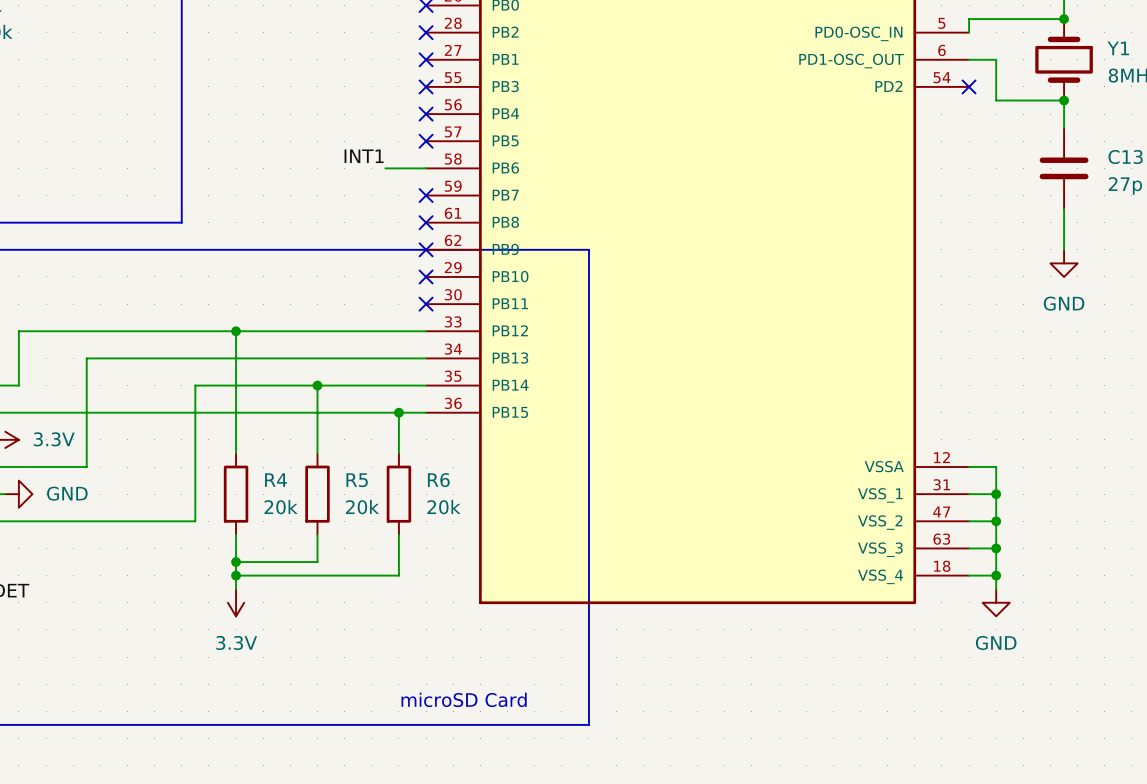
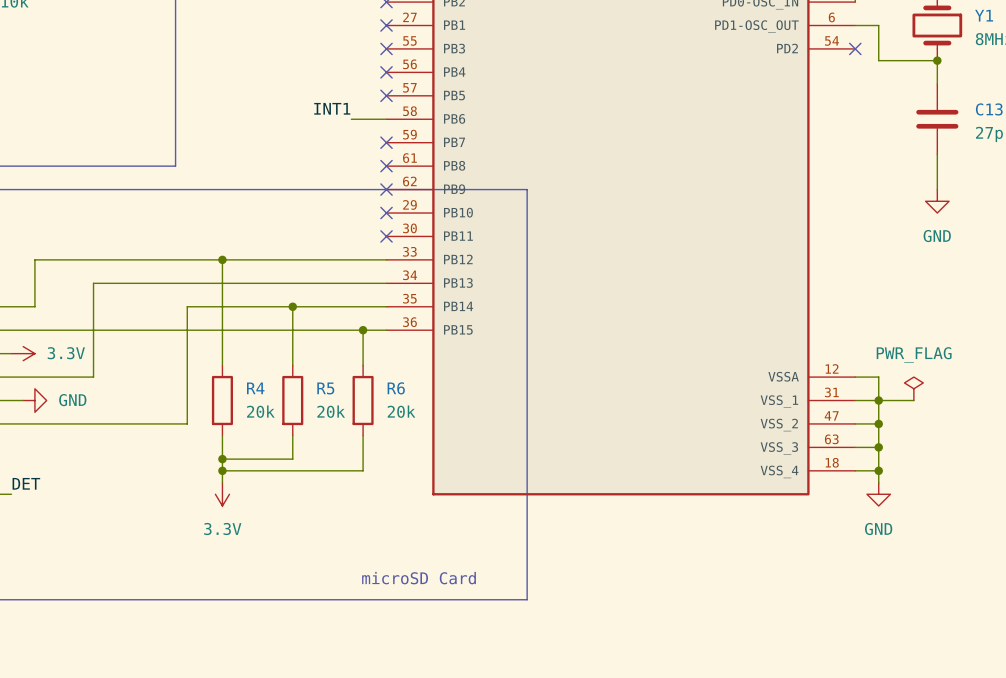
power symbol: none -> PWR_FLAG (913, 388)
wire: none -> (878, 400) (913, 400)

